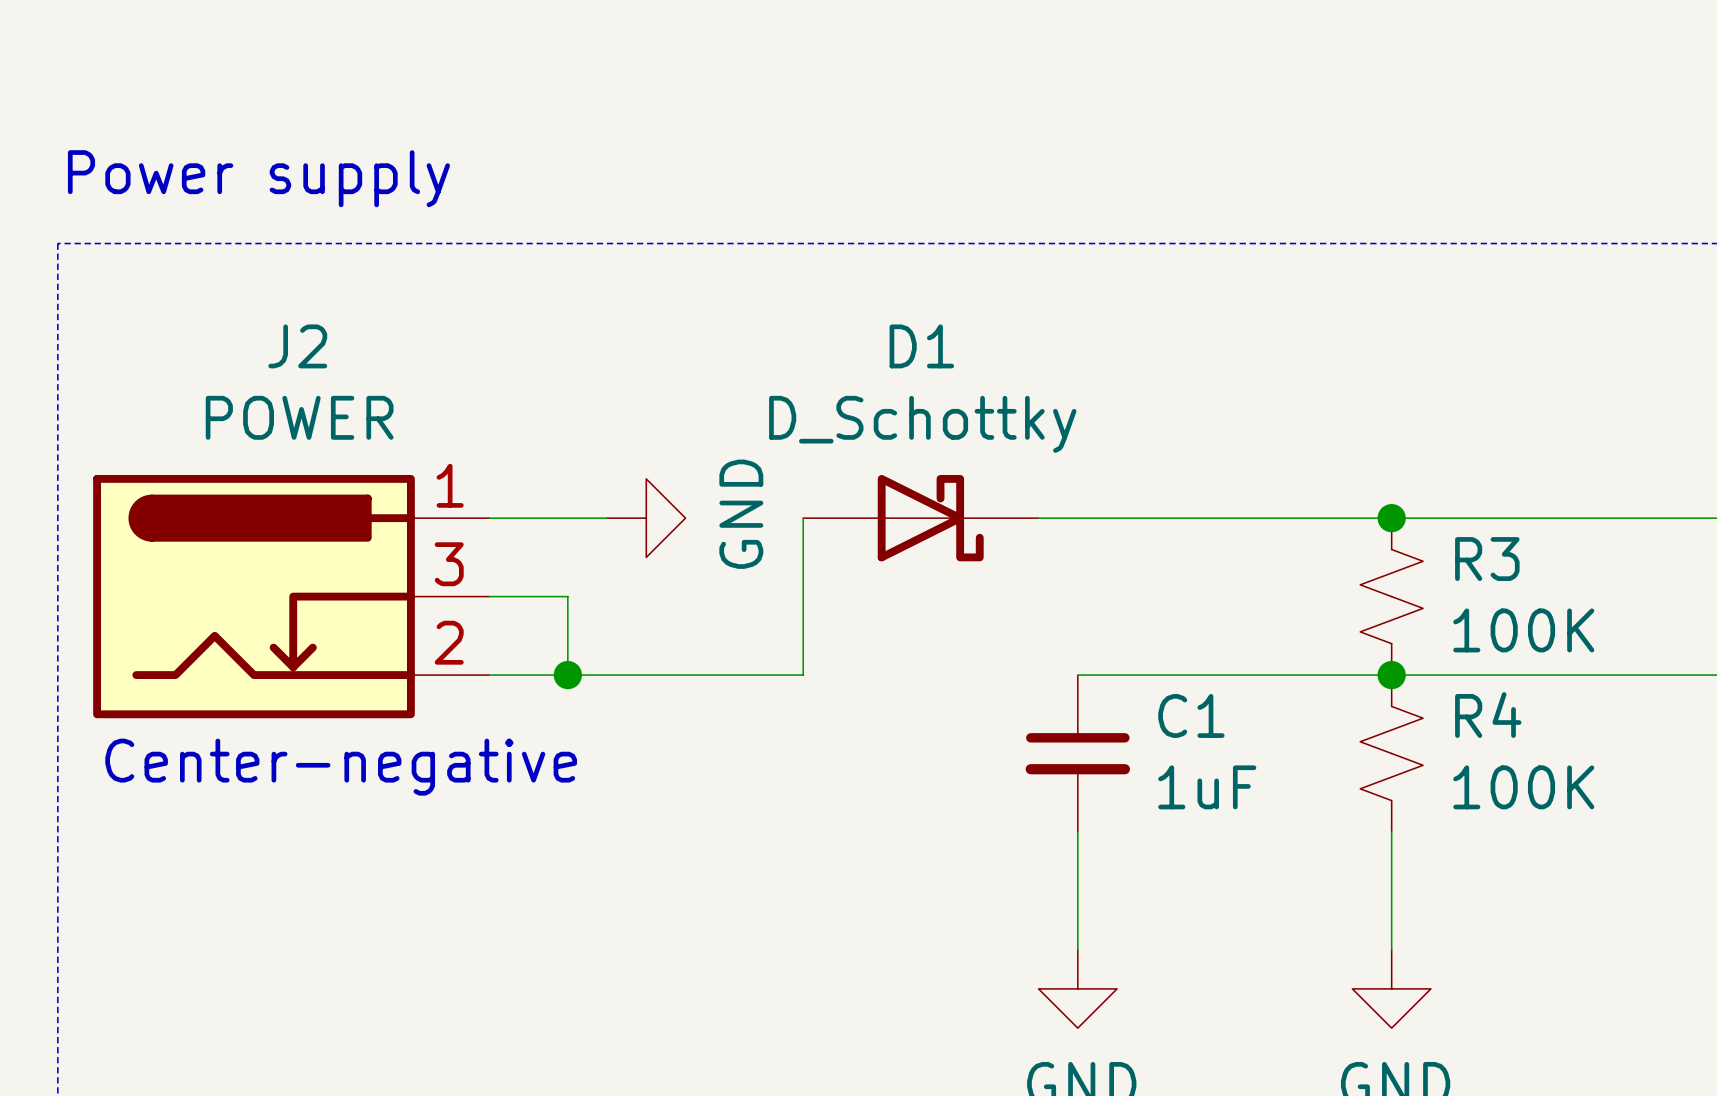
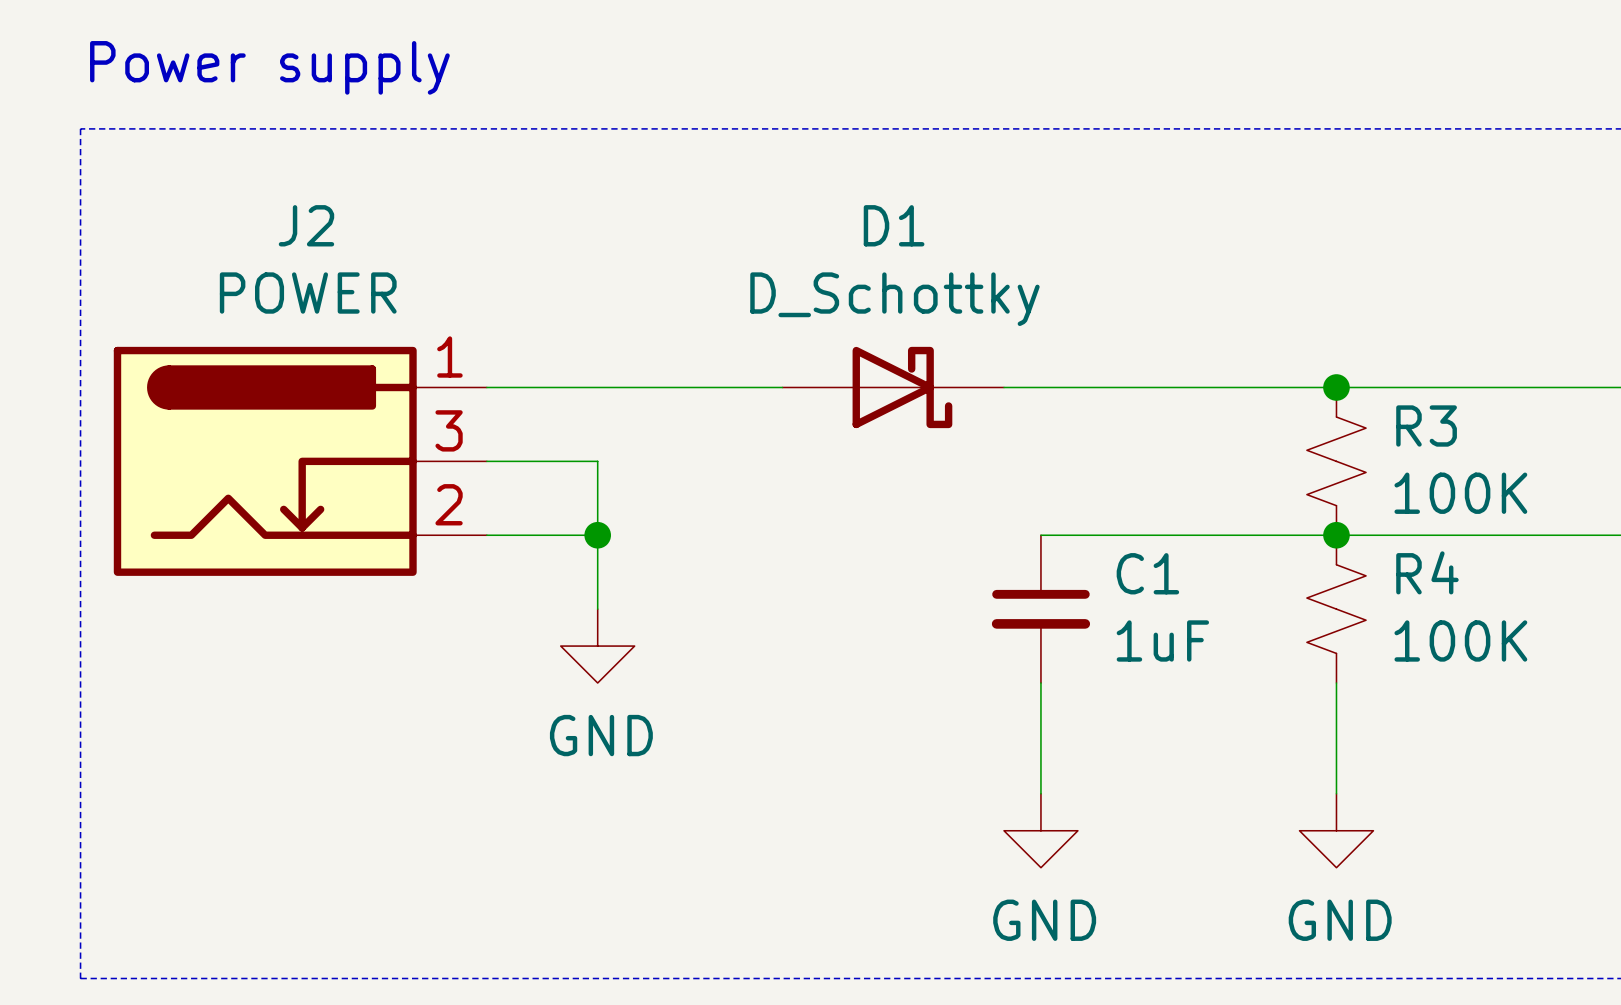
power symbol rotation: 0° (646, 518) -> 90° clockwise (597, 646)
power symbol position: GND (646, 518) -> GND (597, 646)
wire: (803, 518) (803, 675) (607, 675) -> (782, 387) (597, 387)
wire: (567, 596) (567, 675) -> (560, 461) (597, 461) (597, 609)
junction position: (567, 675) -> (597, 535)
text: Center-negative (341, 767) -> none

